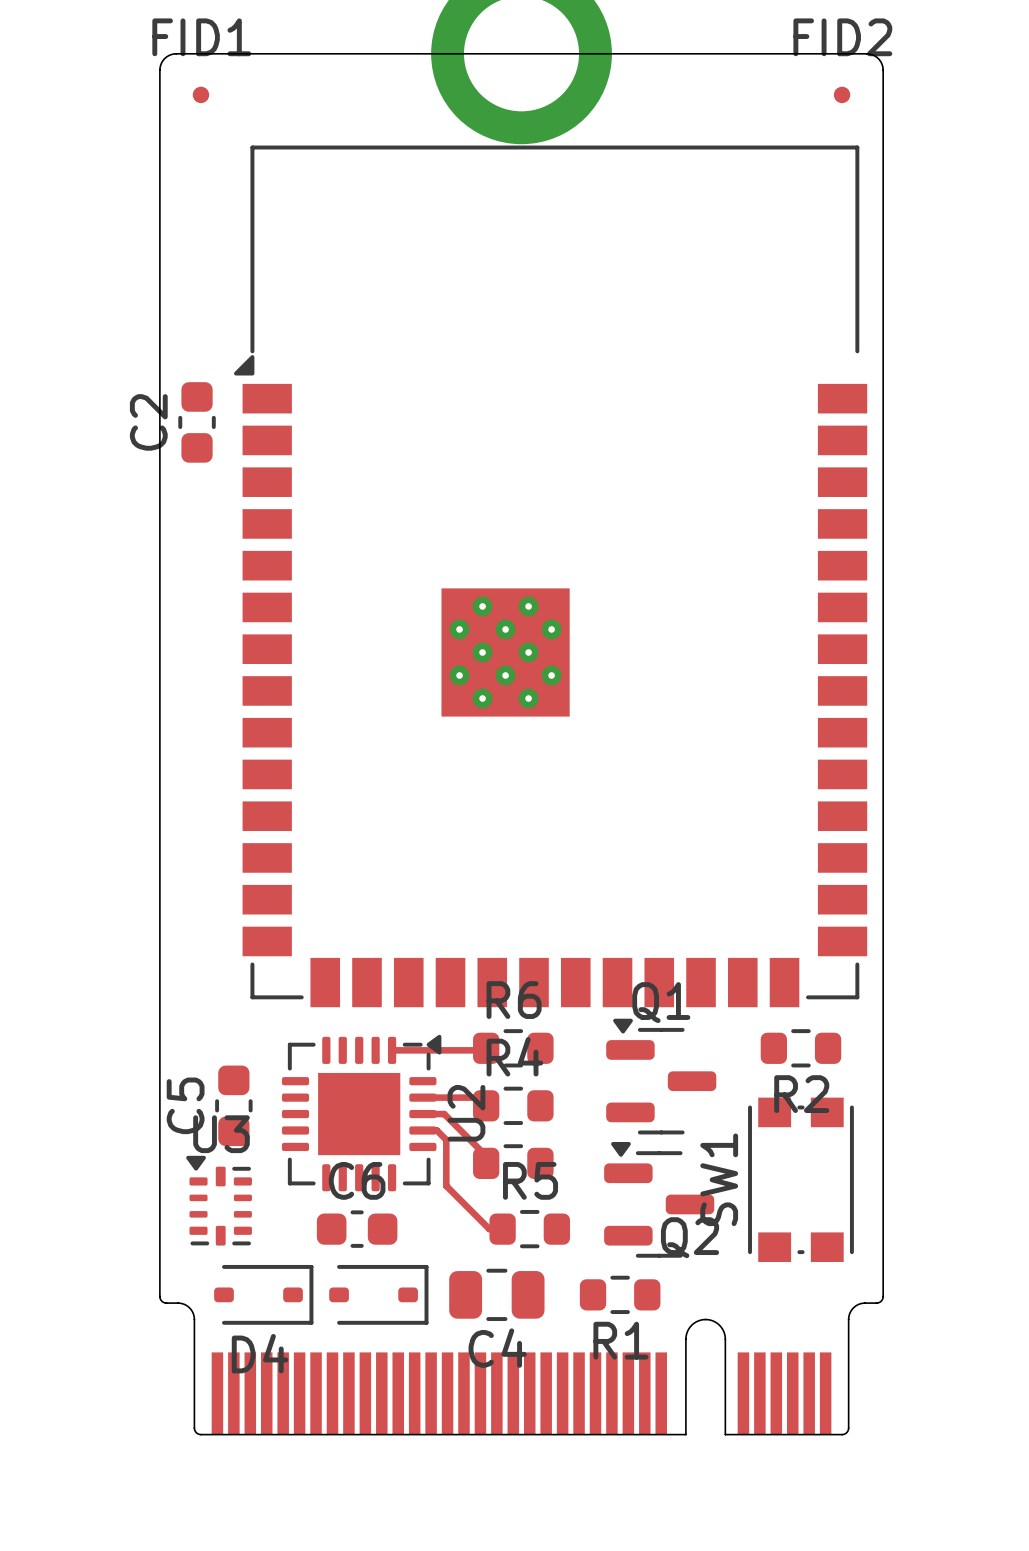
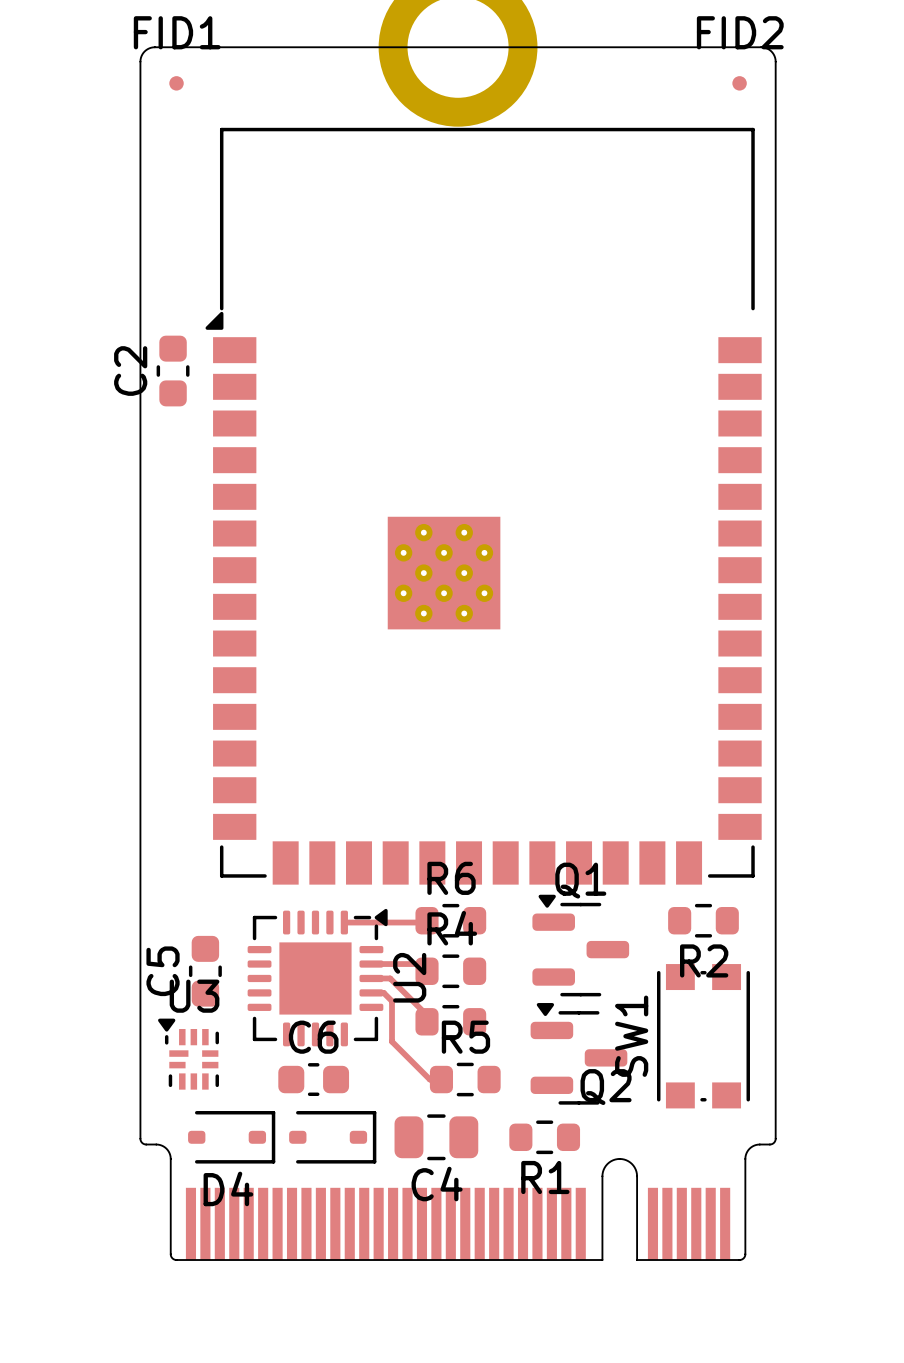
U3 footprint: [186, 1155, 252, 1246] -> [158, 1018, 219, 1090]

